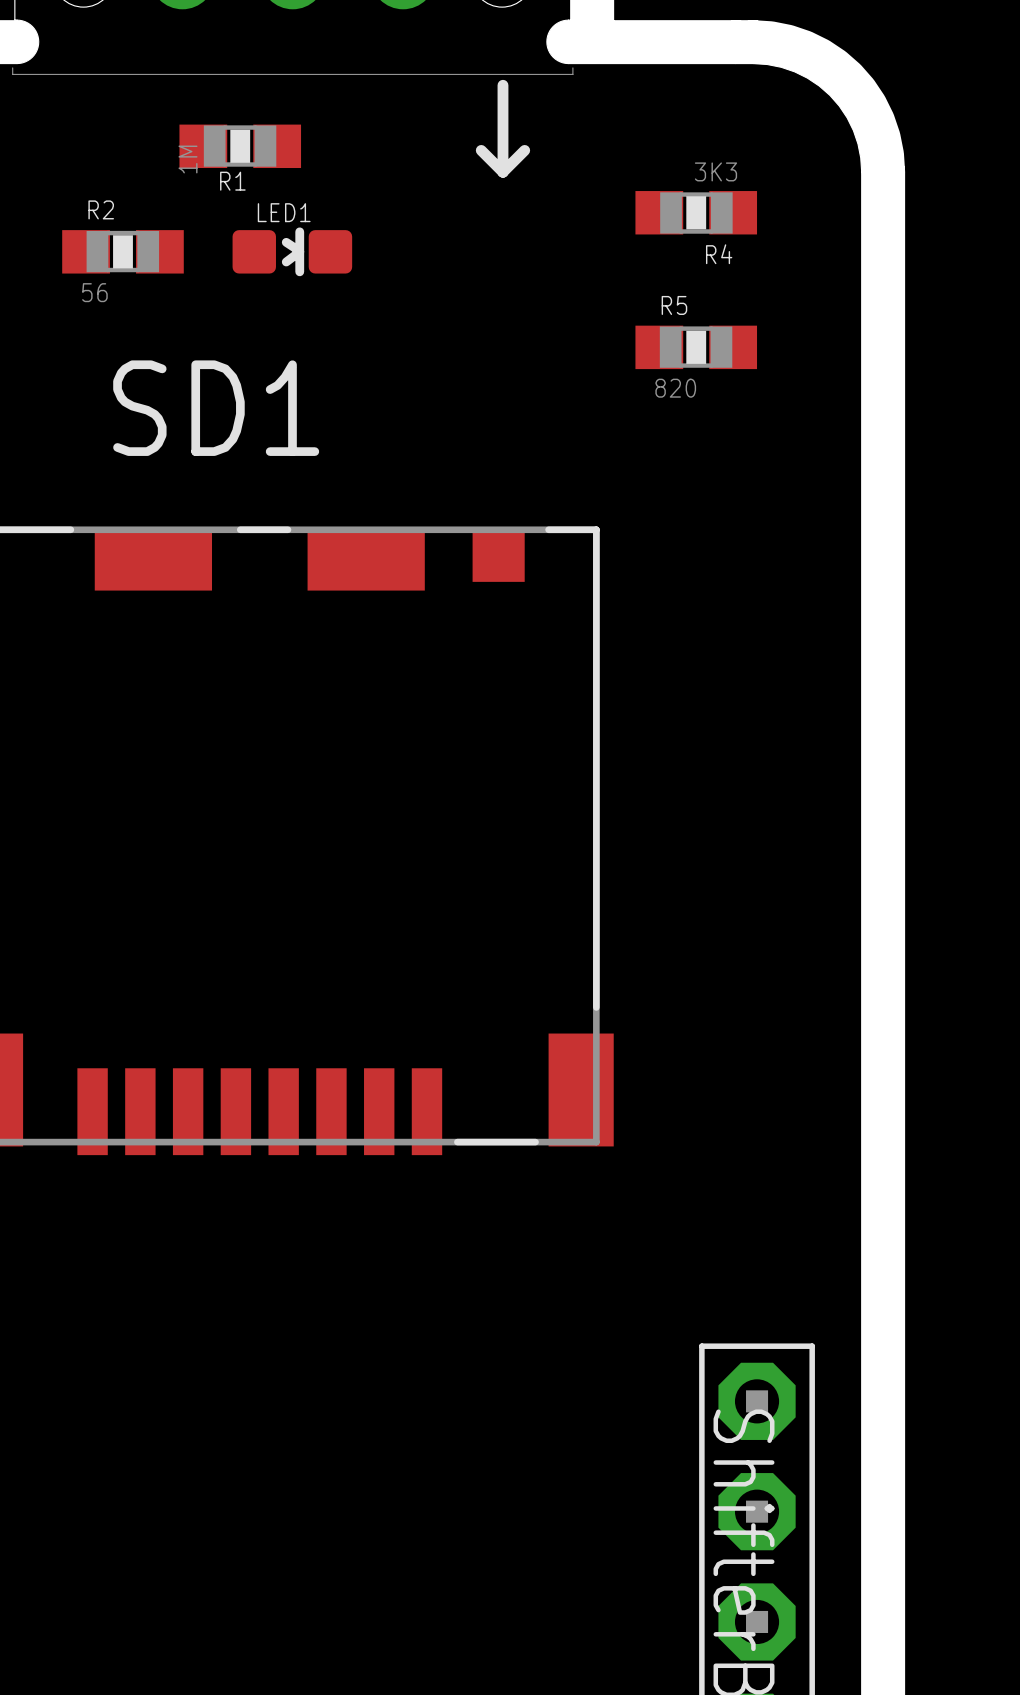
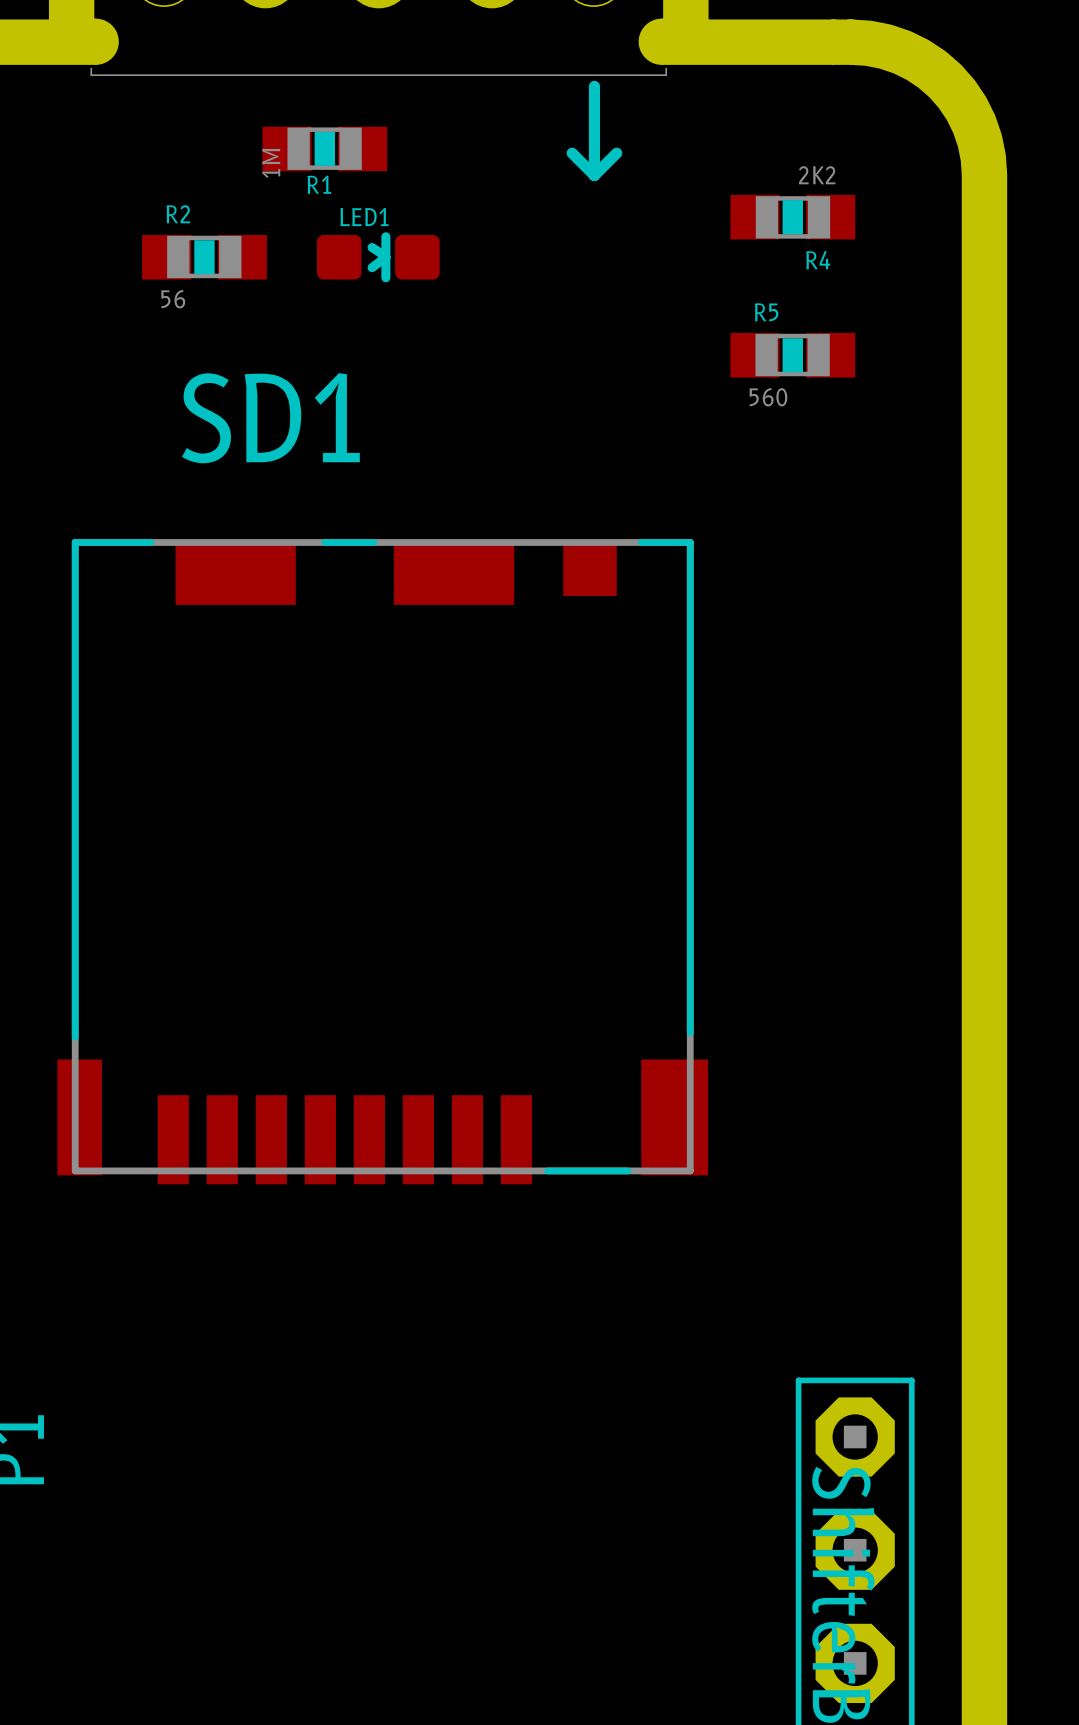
R4 value: 3K3 (715, 171) -> 2K2 (817, 175)
R5 value: 820 (675, 388) -> 560 (768, 397)

